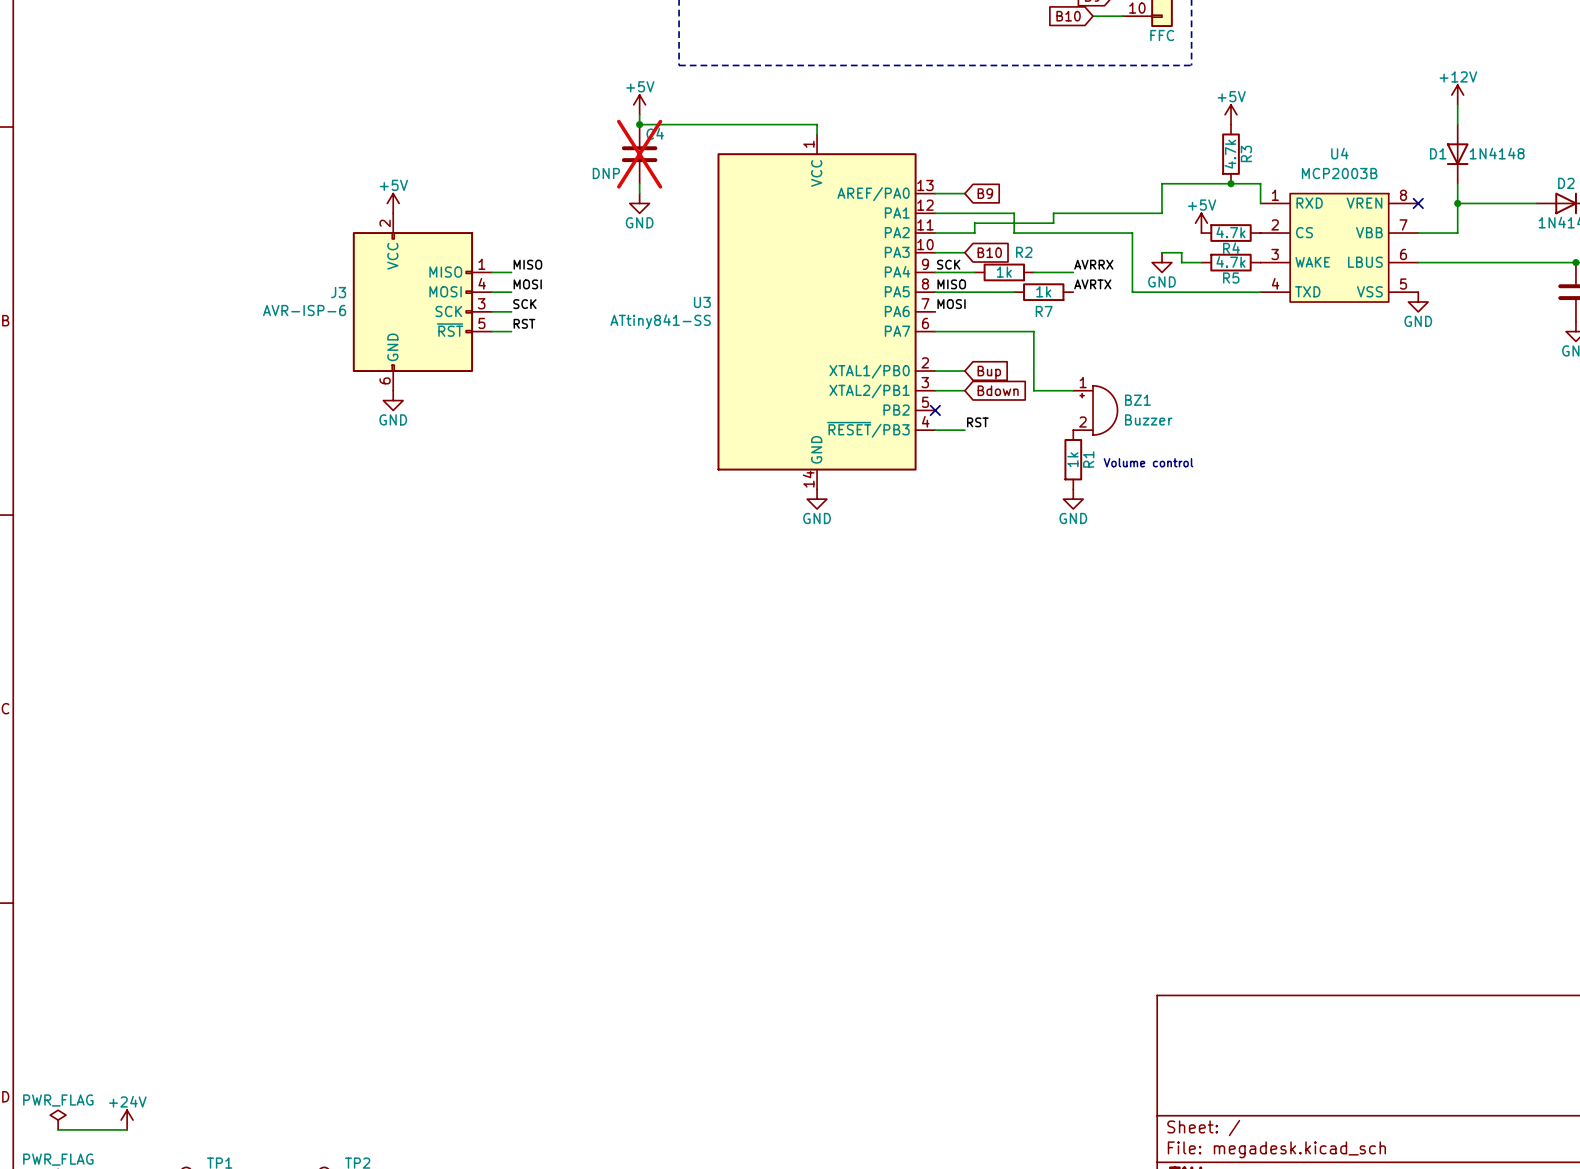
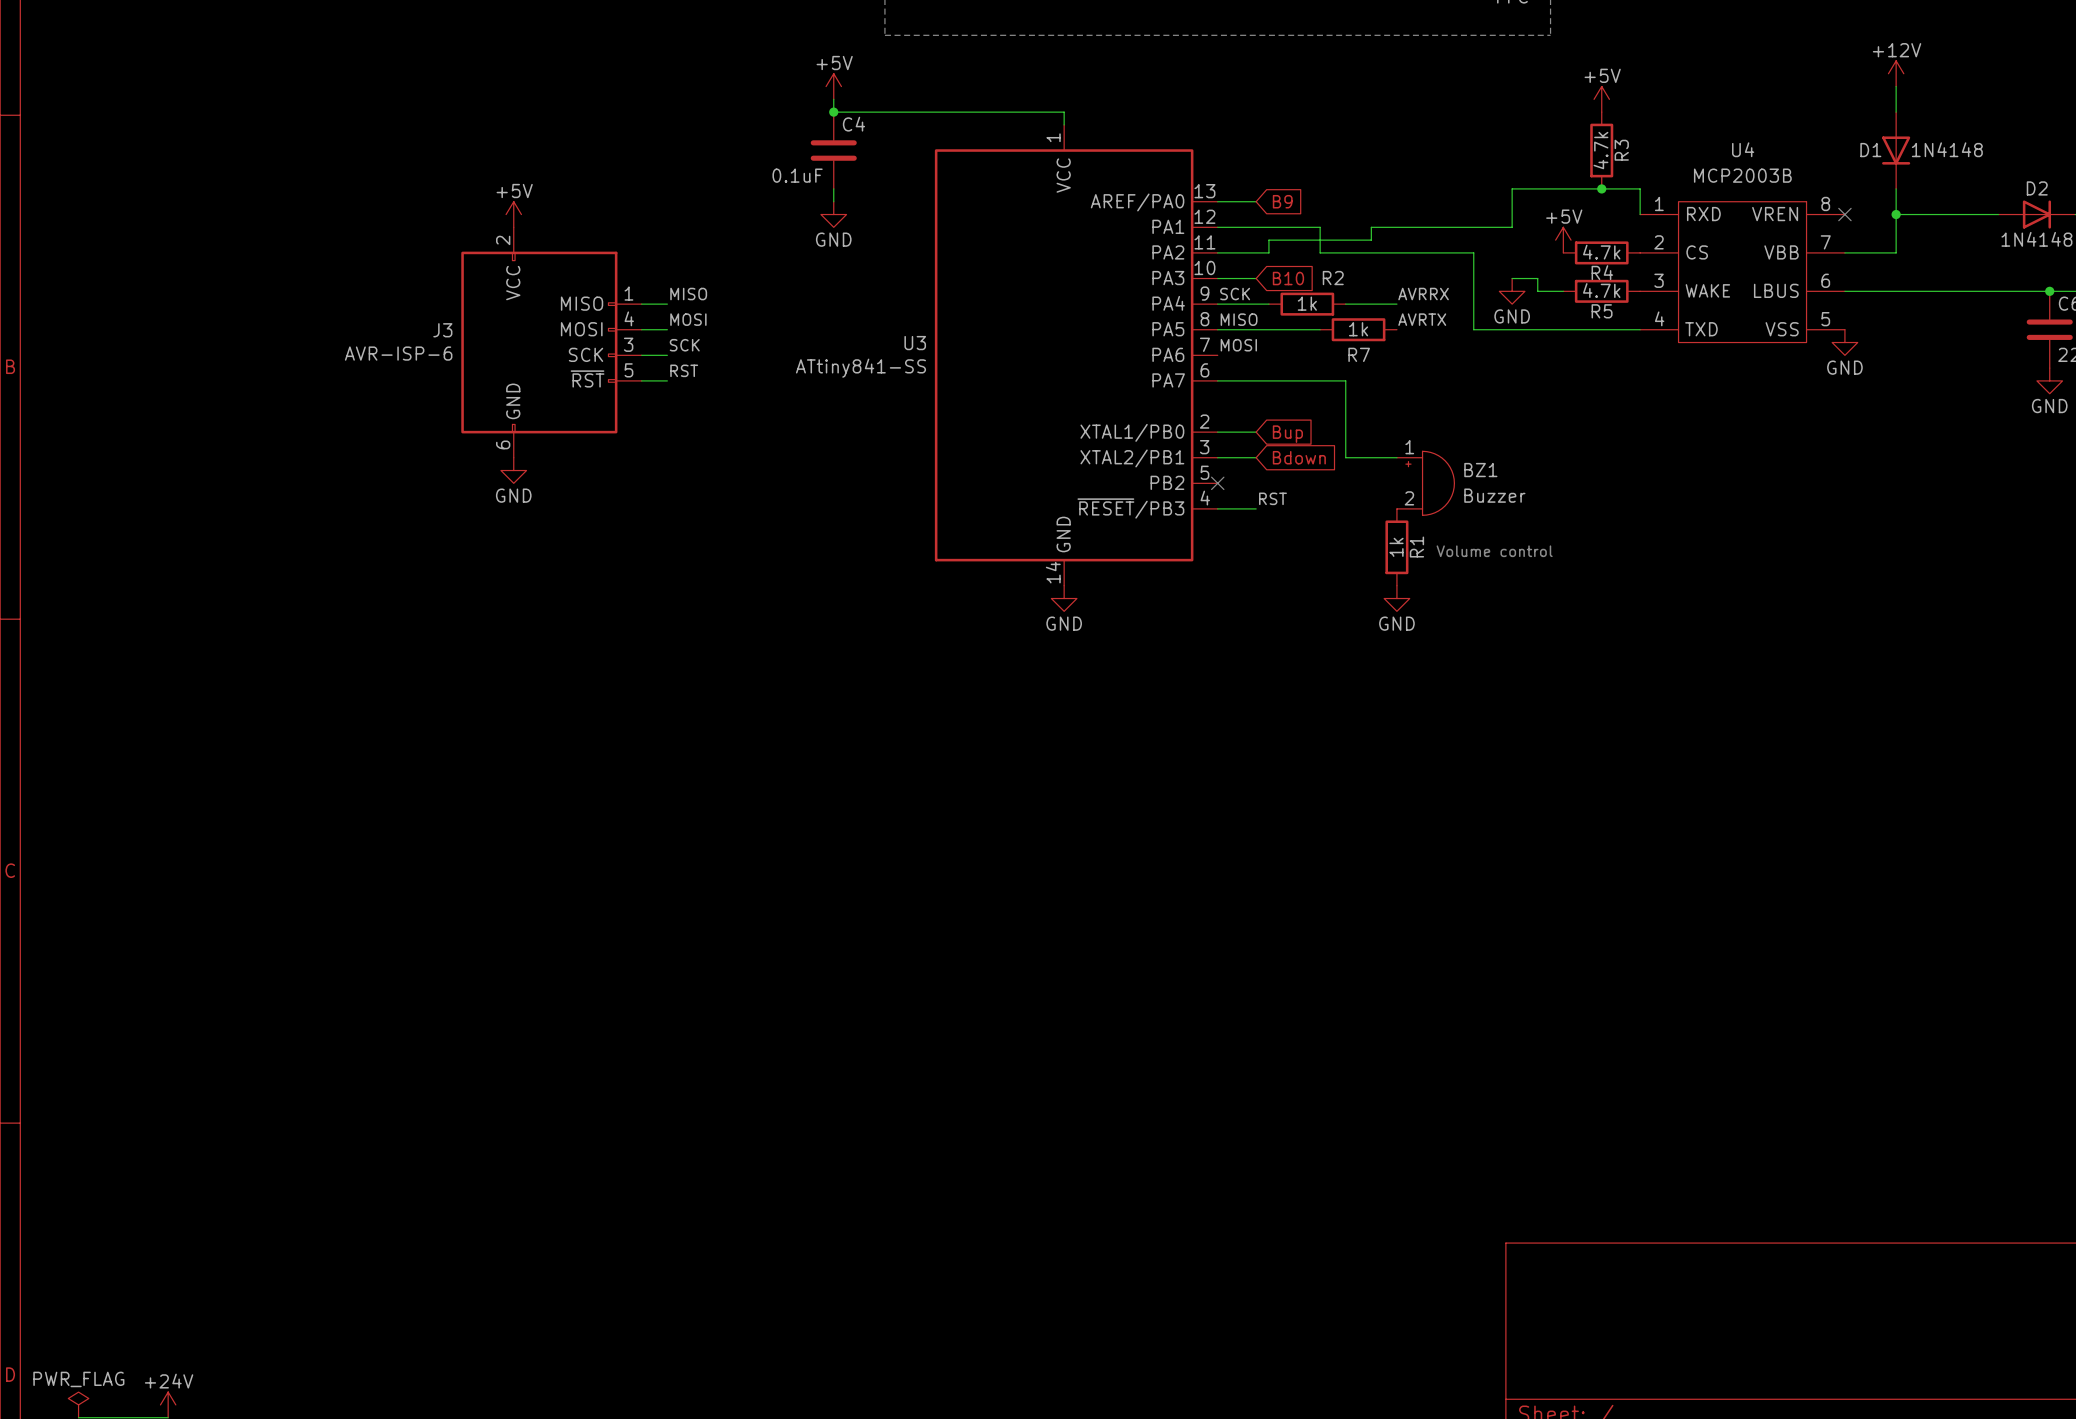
C4 do-not-place cross: (639, 154) -> none
C4 value: DNP (606, 173) -> 0.1uF (797, 175)

